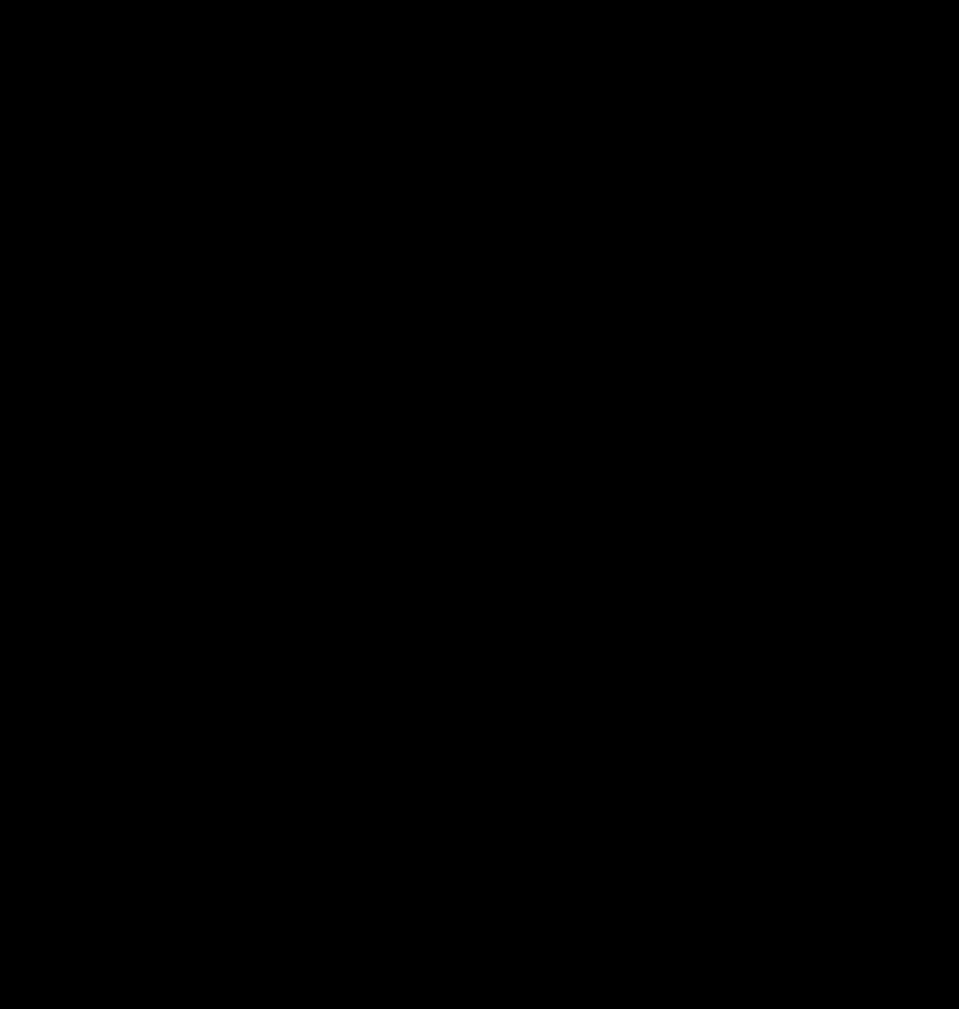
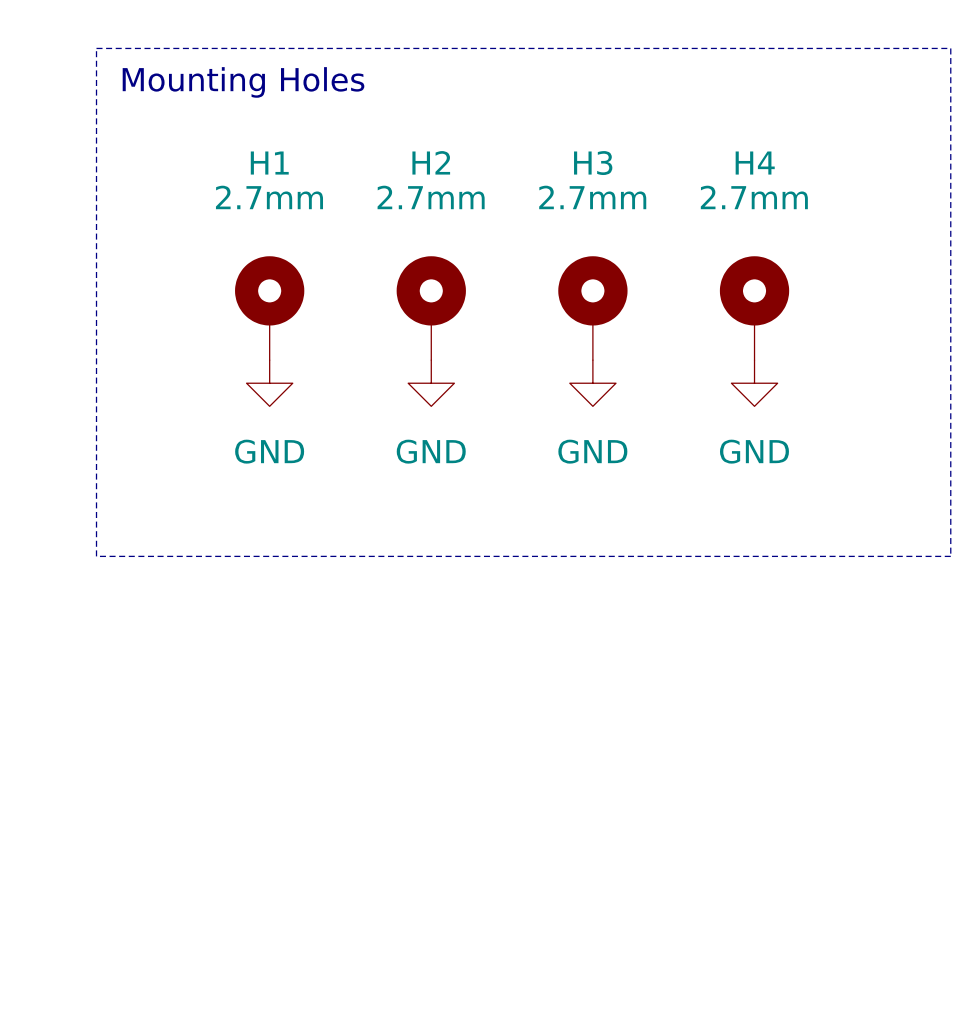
line: none -> (96, 48) (950, 48) (950, 556) (96, 556) (96, 48)
text: none -> Mounting Holes (243, 82)
H1: none -> 2.7mm (269, 308)
H2: none -> 2.7mm (431, 308)
H3: none -> 2.7mm (592, 308)
H4: none -> 2.7mm (754, 308)
power symbol: none -> GND (269, 383)
power symbol: none -> GND (431, 383)
power symbol: none -> GND (592, 383)
power symbol: none -> GND (754, 383)

